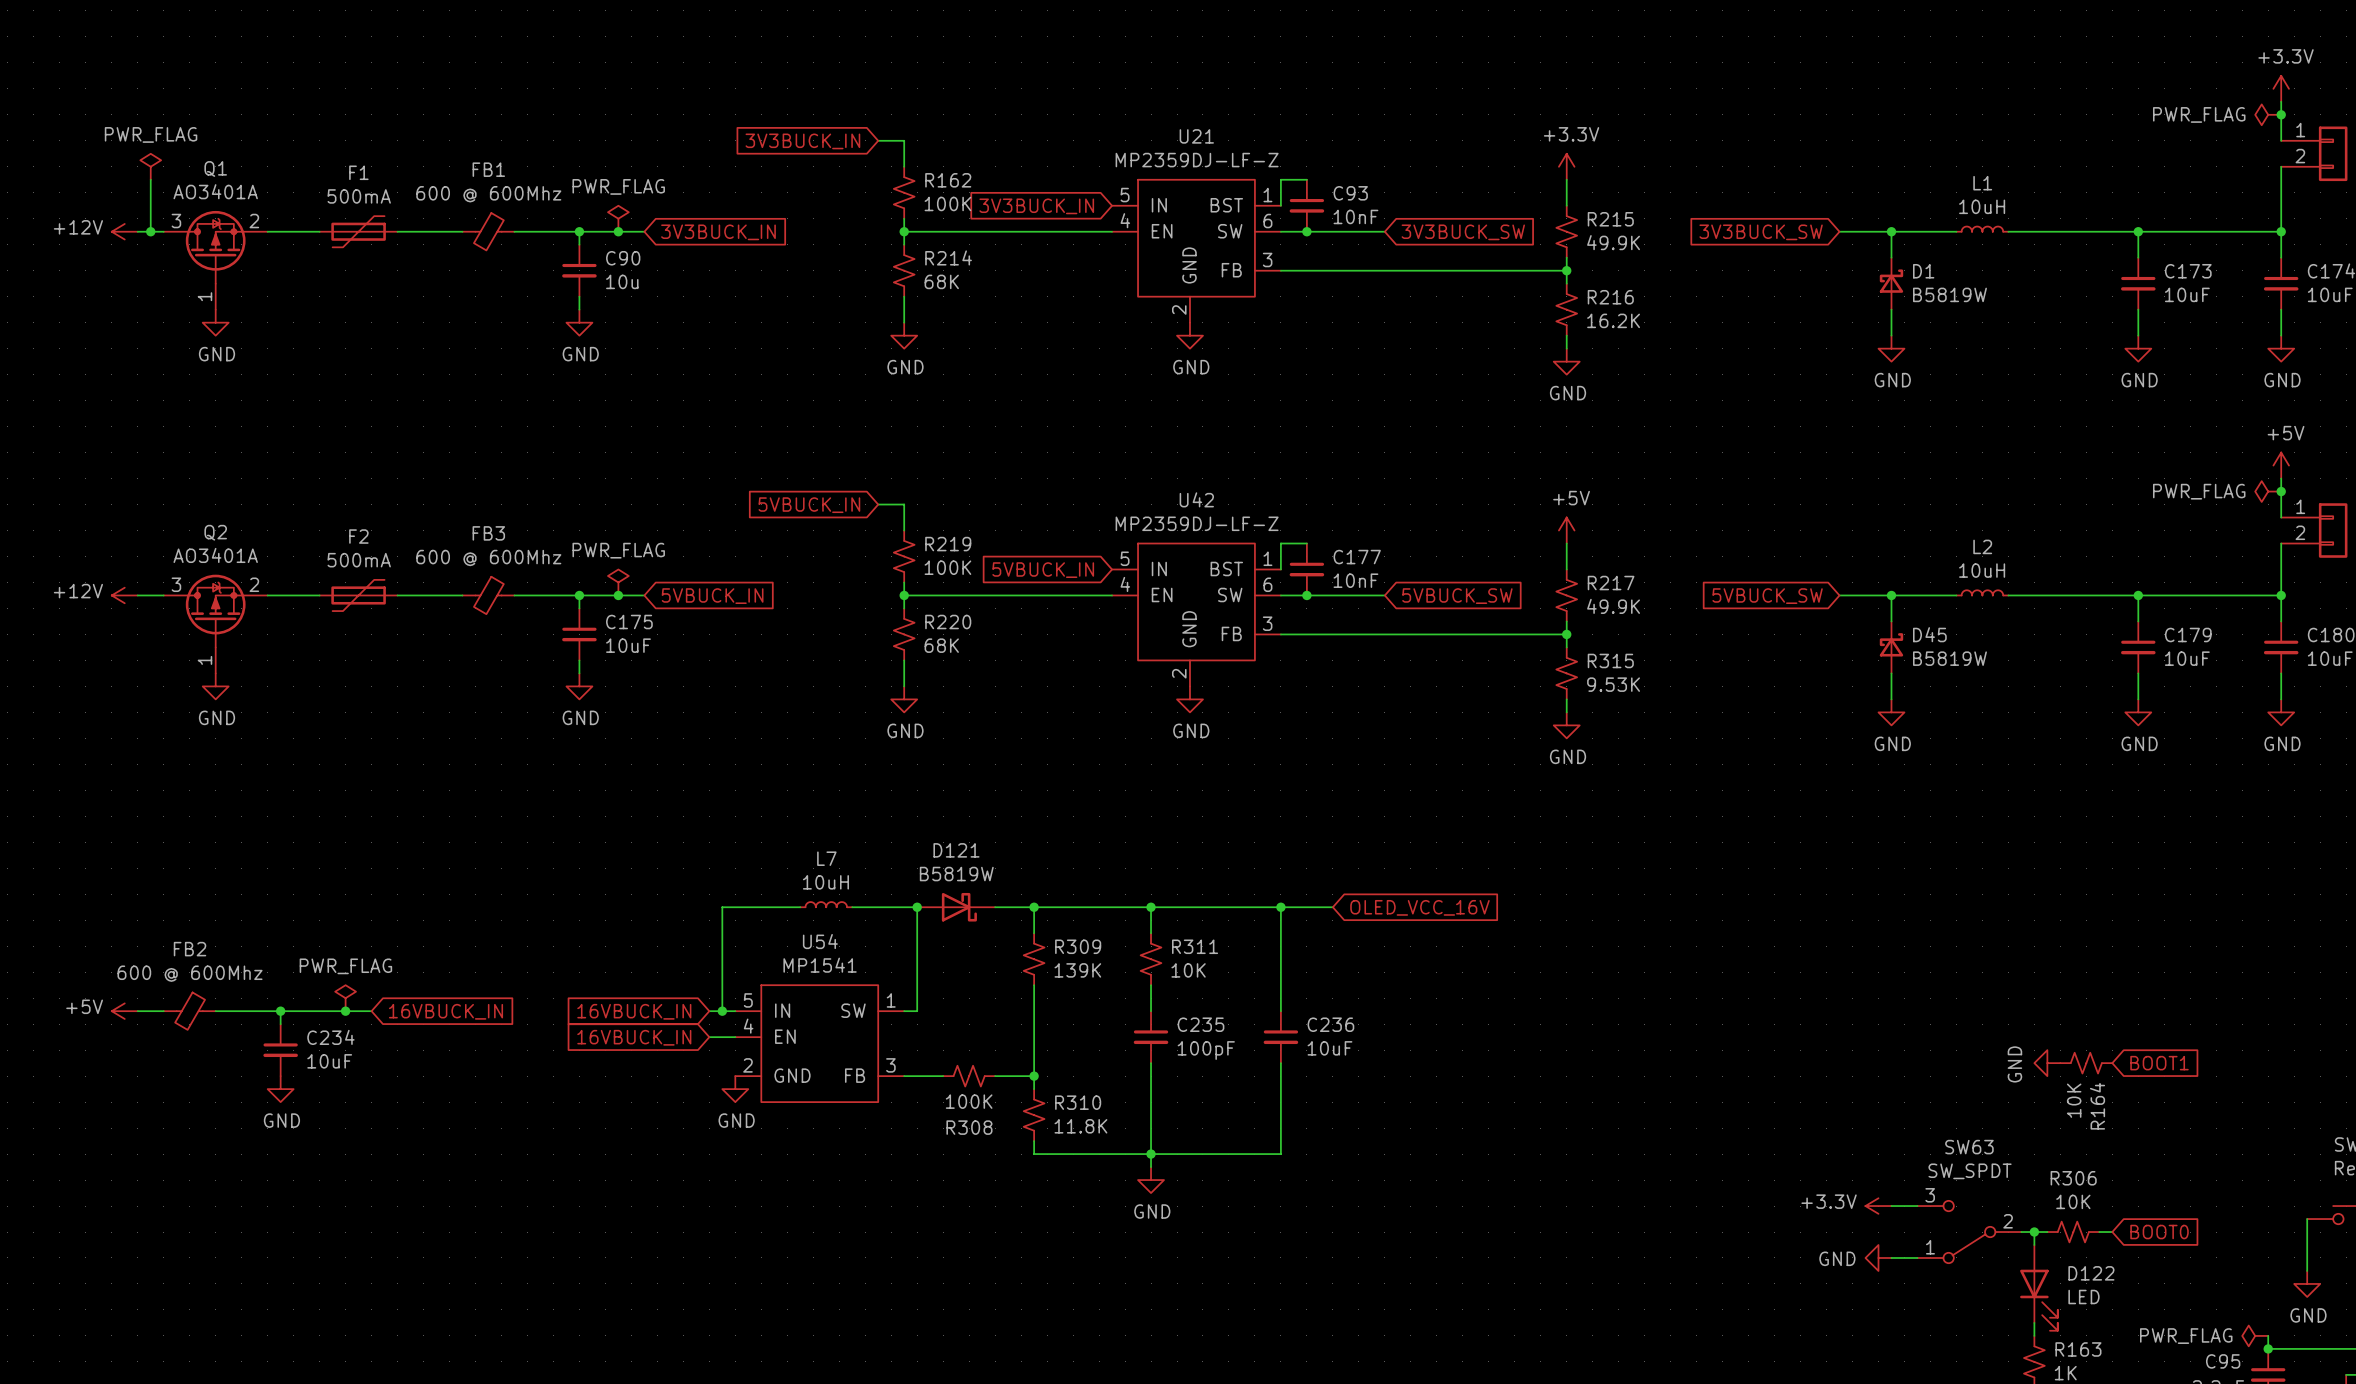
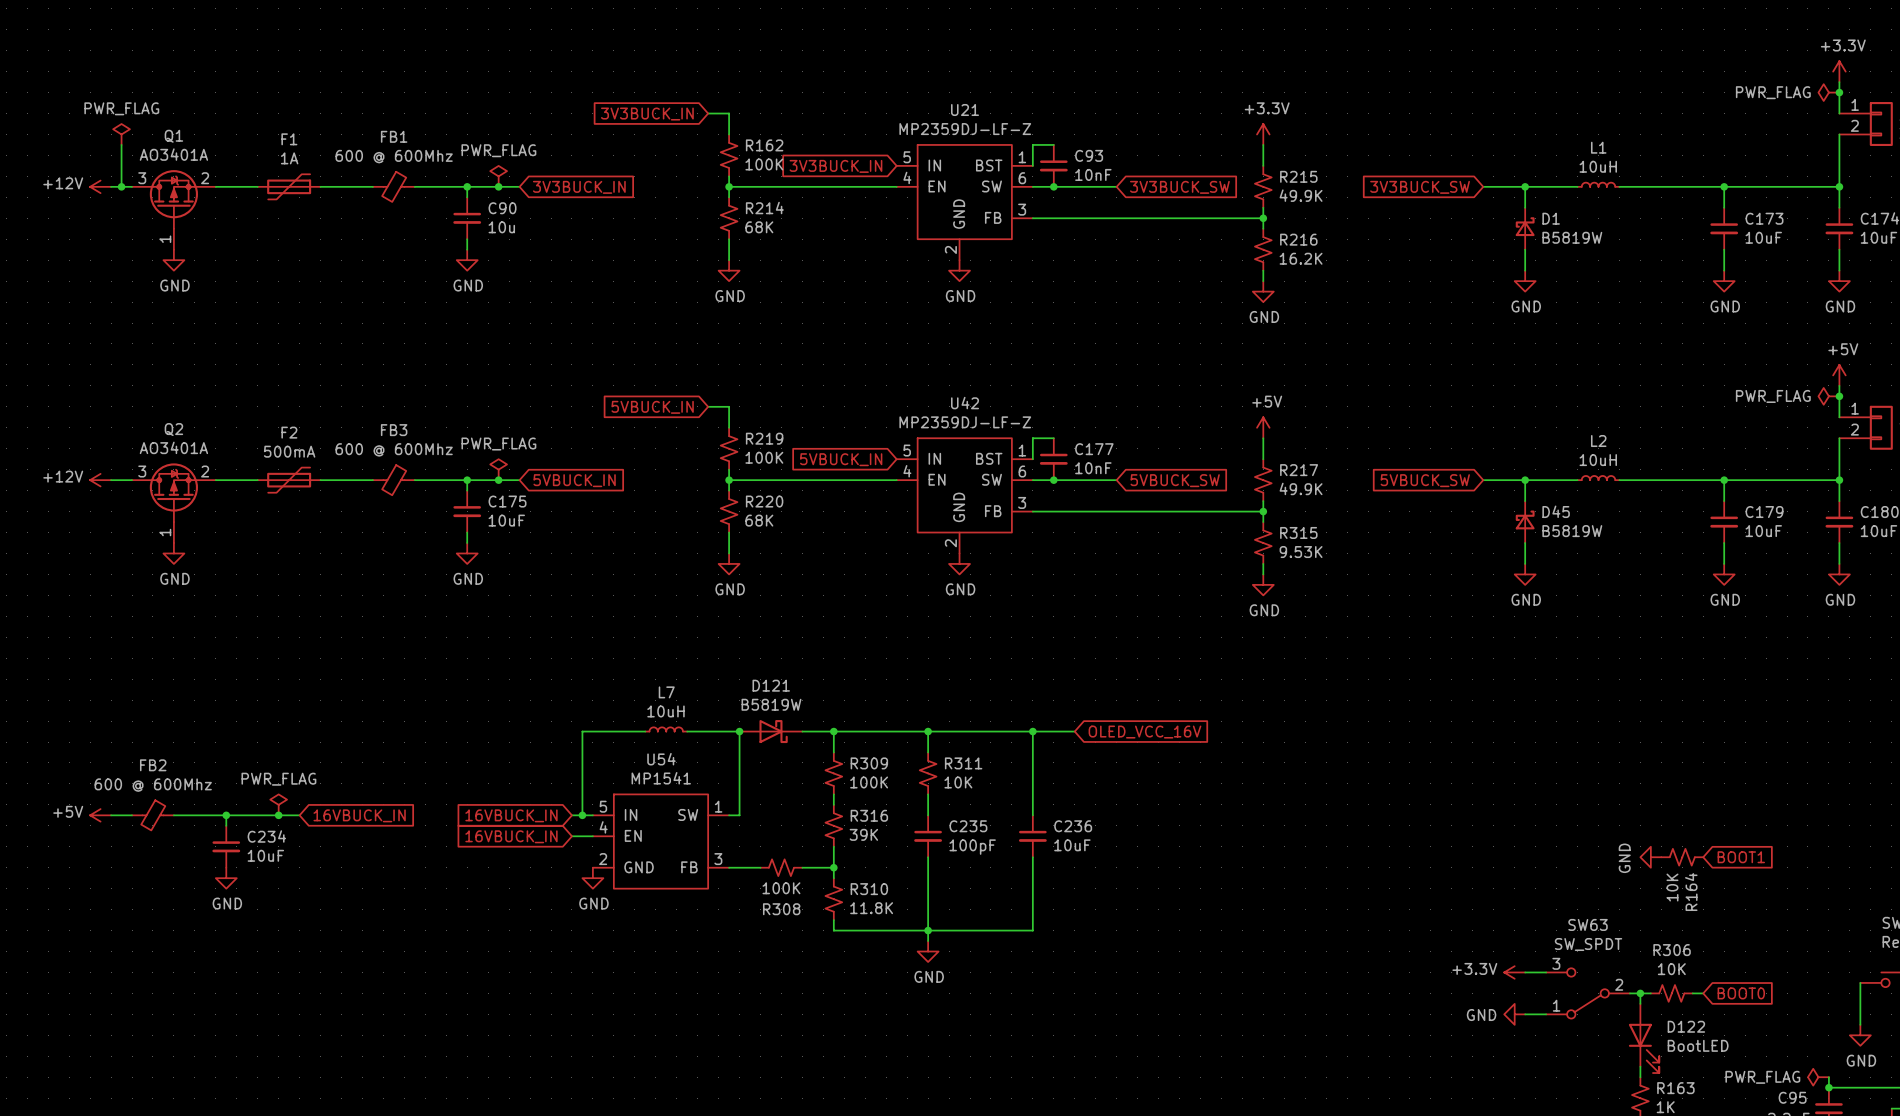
F1 value: 500mA (359, 196) -> 1A (289, 158)
R309 value: 139K (1077, 970) -> 100K (869, 782)
R316: none -> 39K (833, 825)
D122 value: LED (2084, 1297) -> BootLED (1698, 1045)

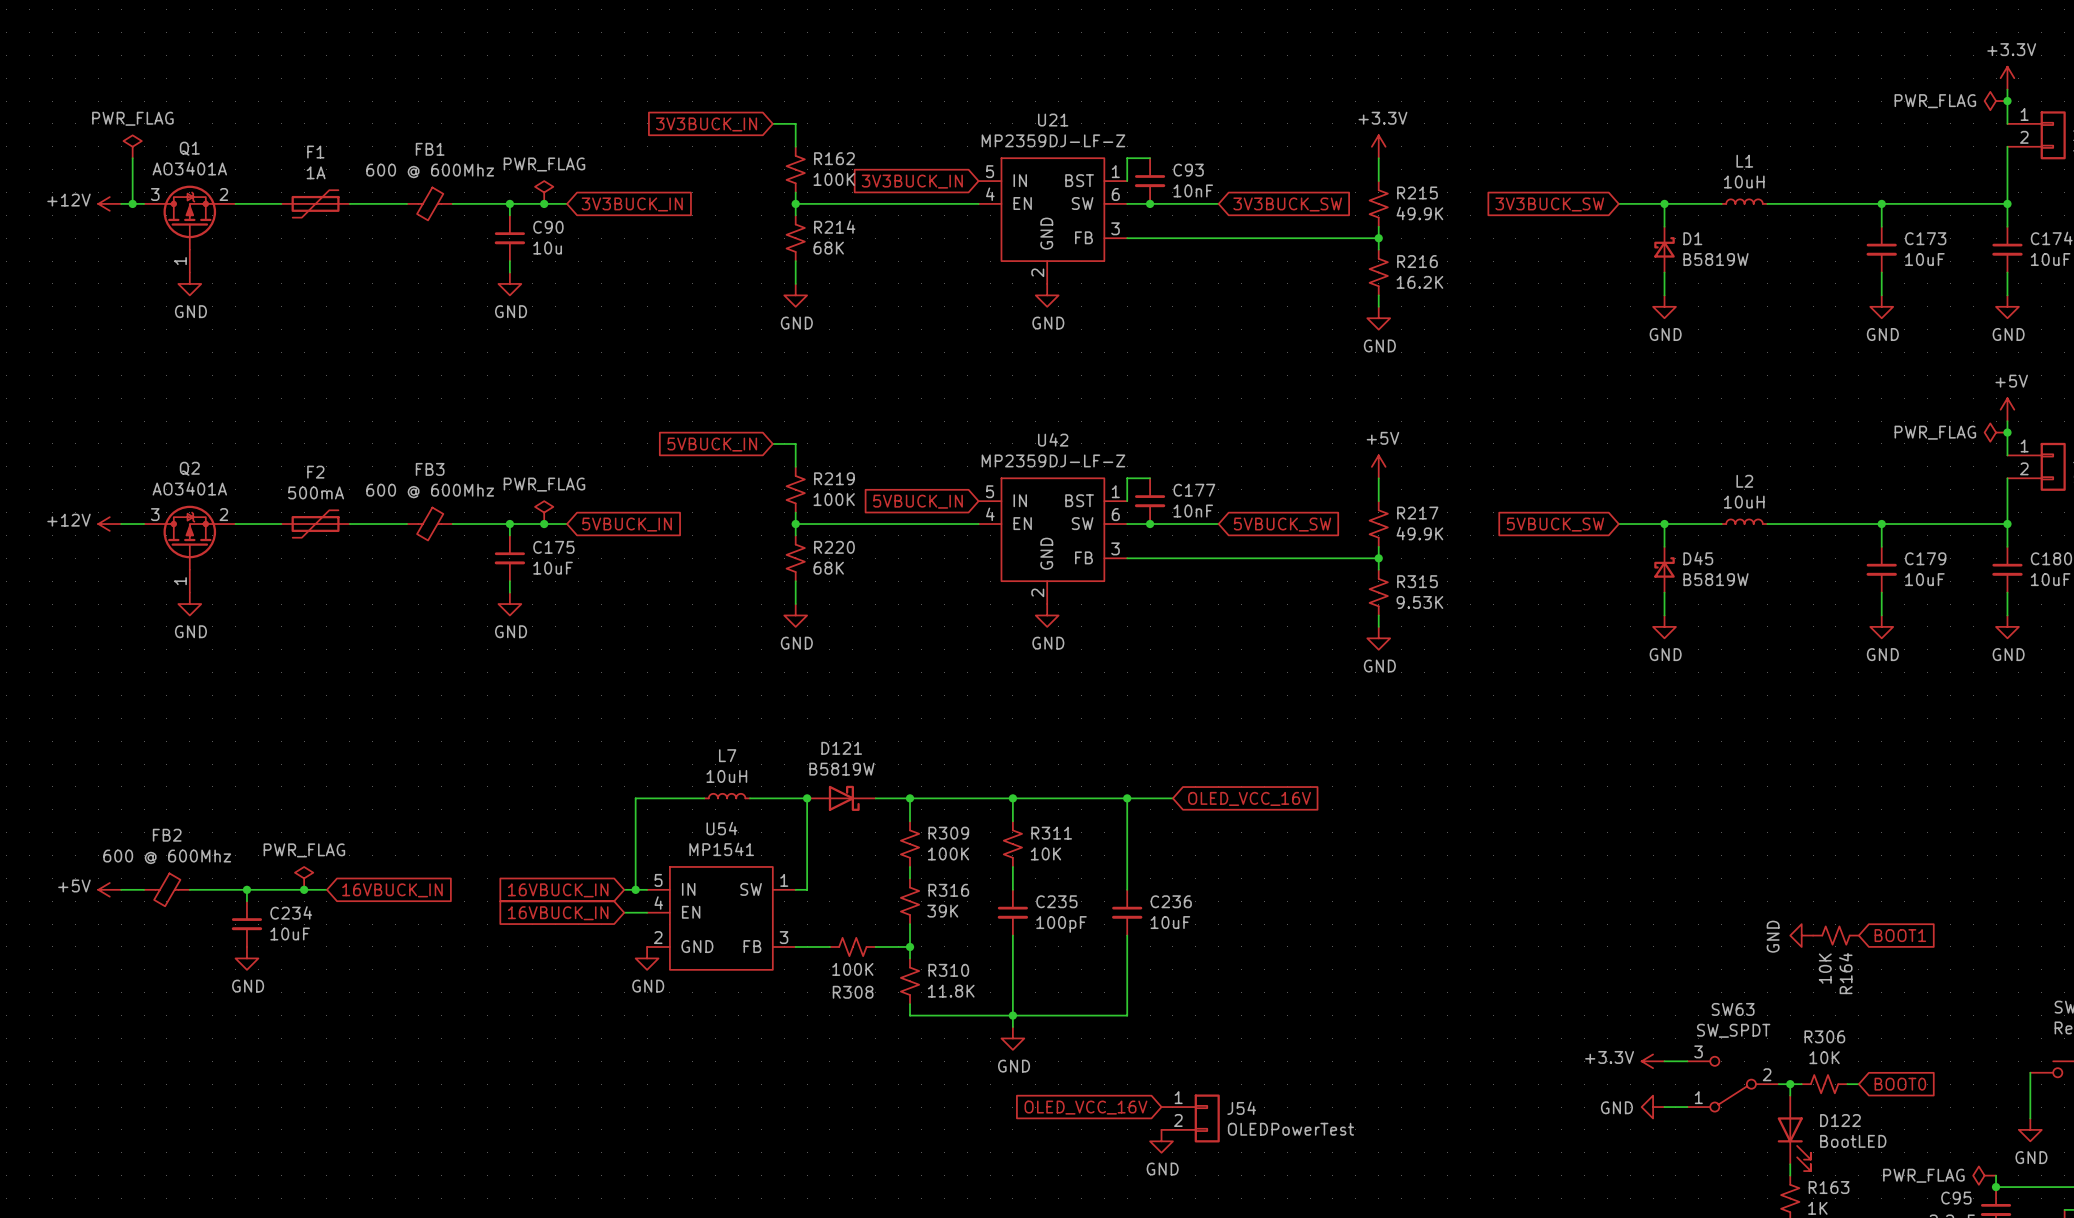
global label: none -> OLED_VCC_16V (1085, 1107)
J54: none -> OLEDPowerTest (1190, 1118)
power symbol: none -> GND (1161, 1141)

